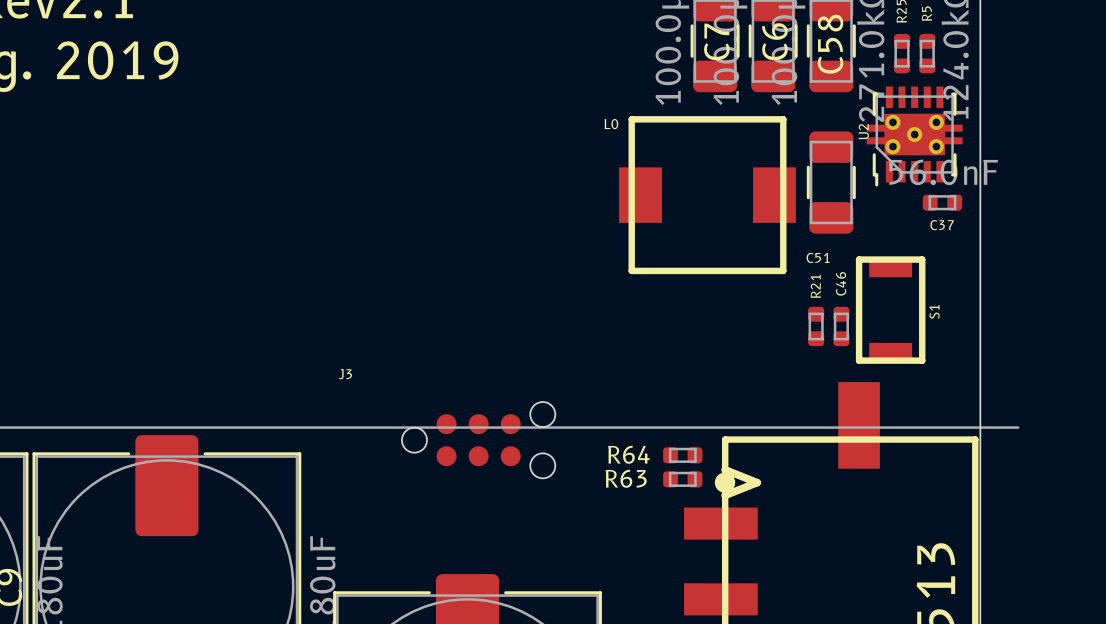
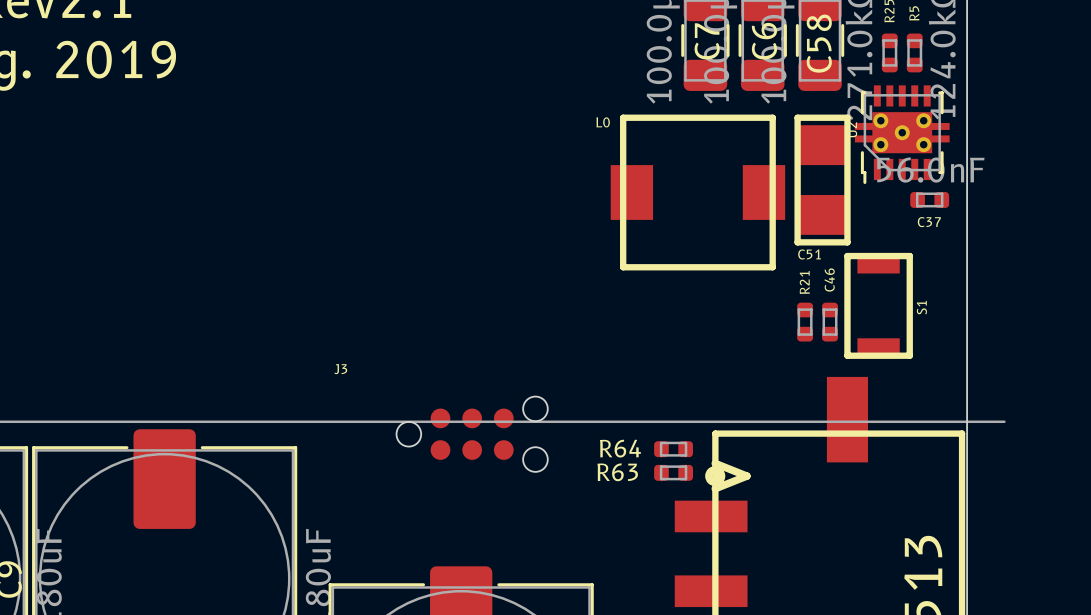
C51 footprint: [806, 131, 856, 234] -> [794, 114, 851, 246]

